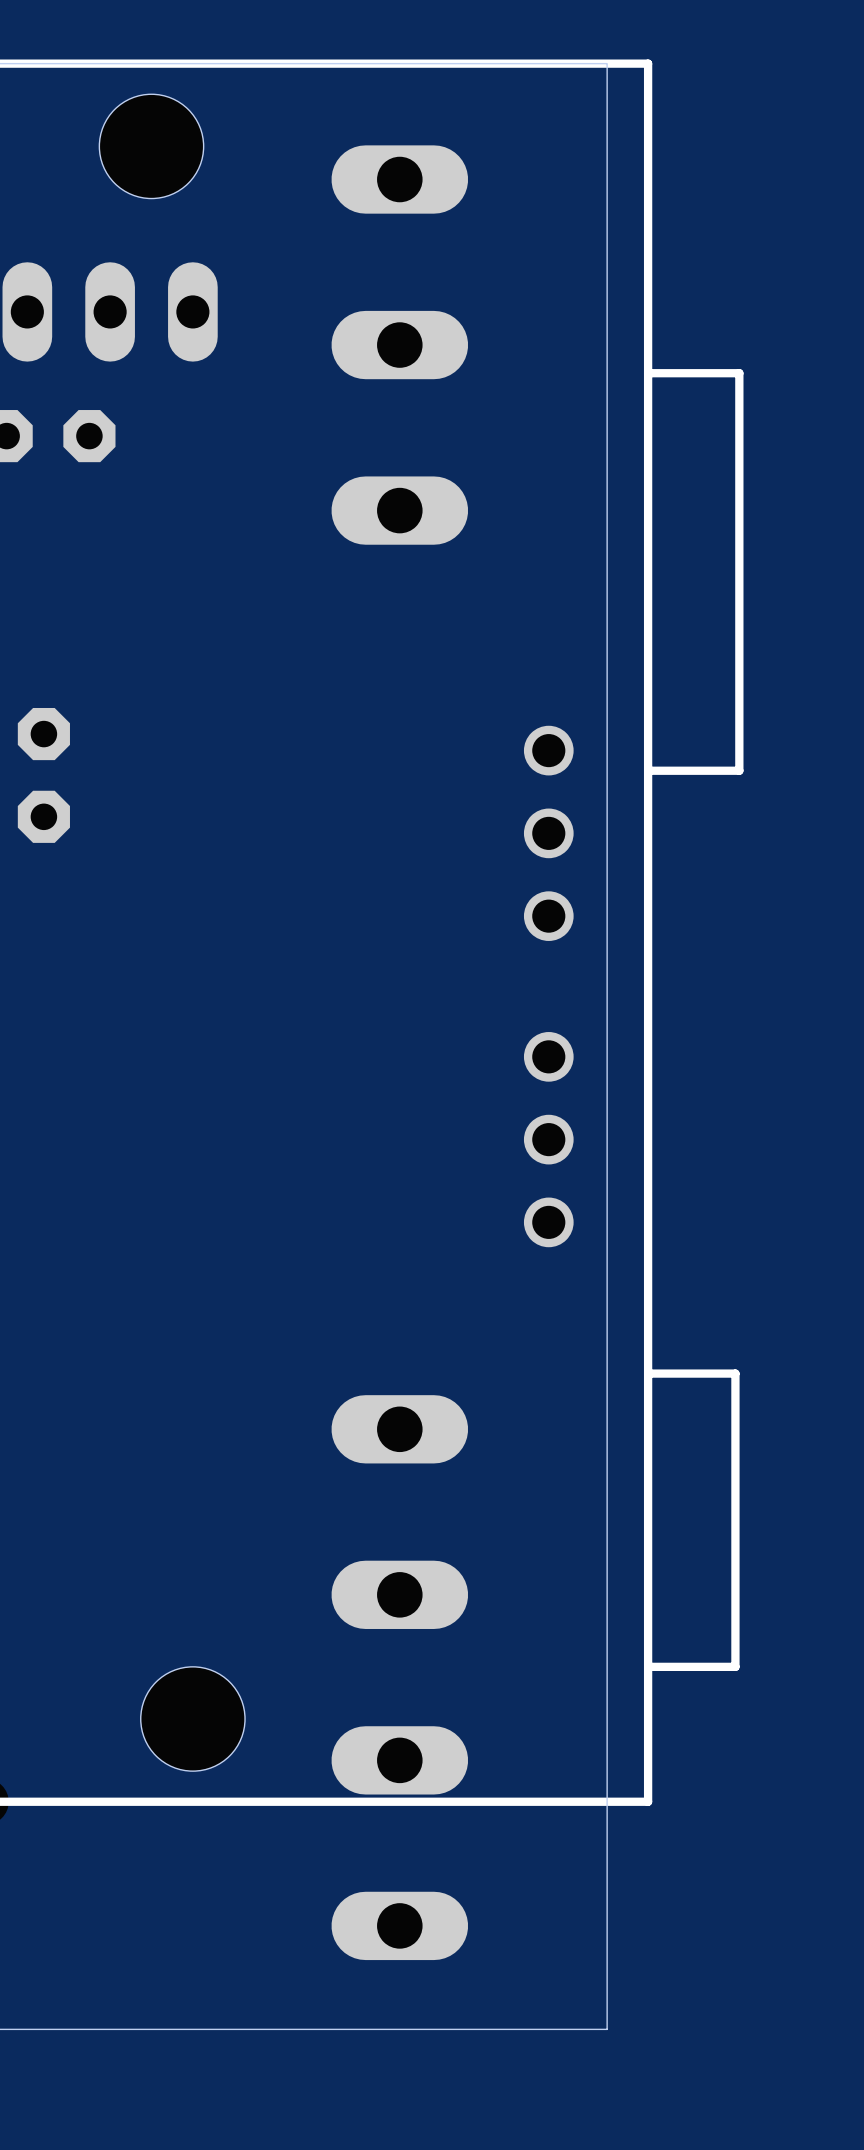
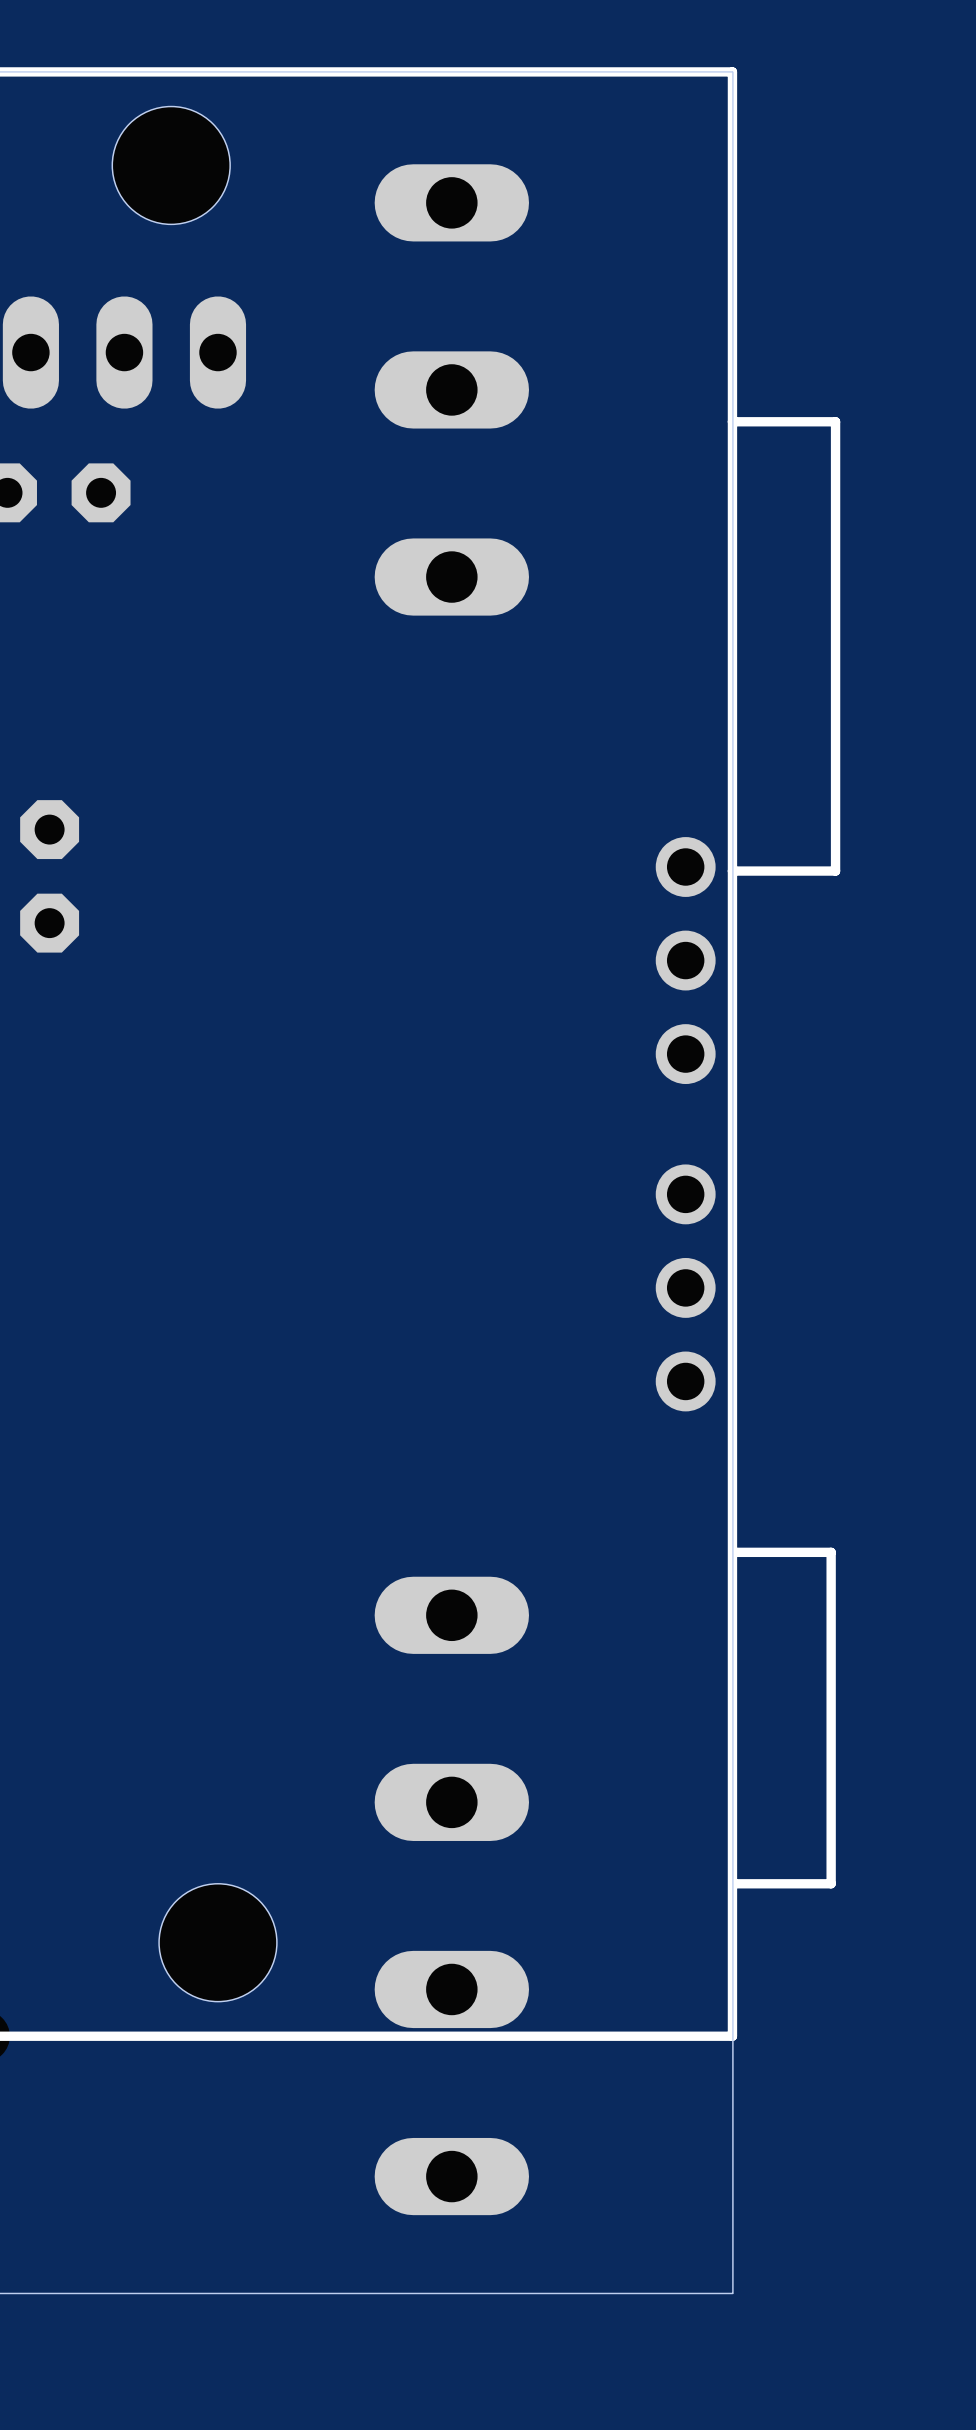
board edge: (607, 63) (607, 2029) -> (732, 2293) (686, 2293)
board edge: none -> (732, 71) (685, 71)
board edge: none -> (732, 72) (732, 2293)
part: (548, 833) -> none
part: none -> (685, 960)
part: (548, 1139) -> none
part: none -> (685, 1287)

